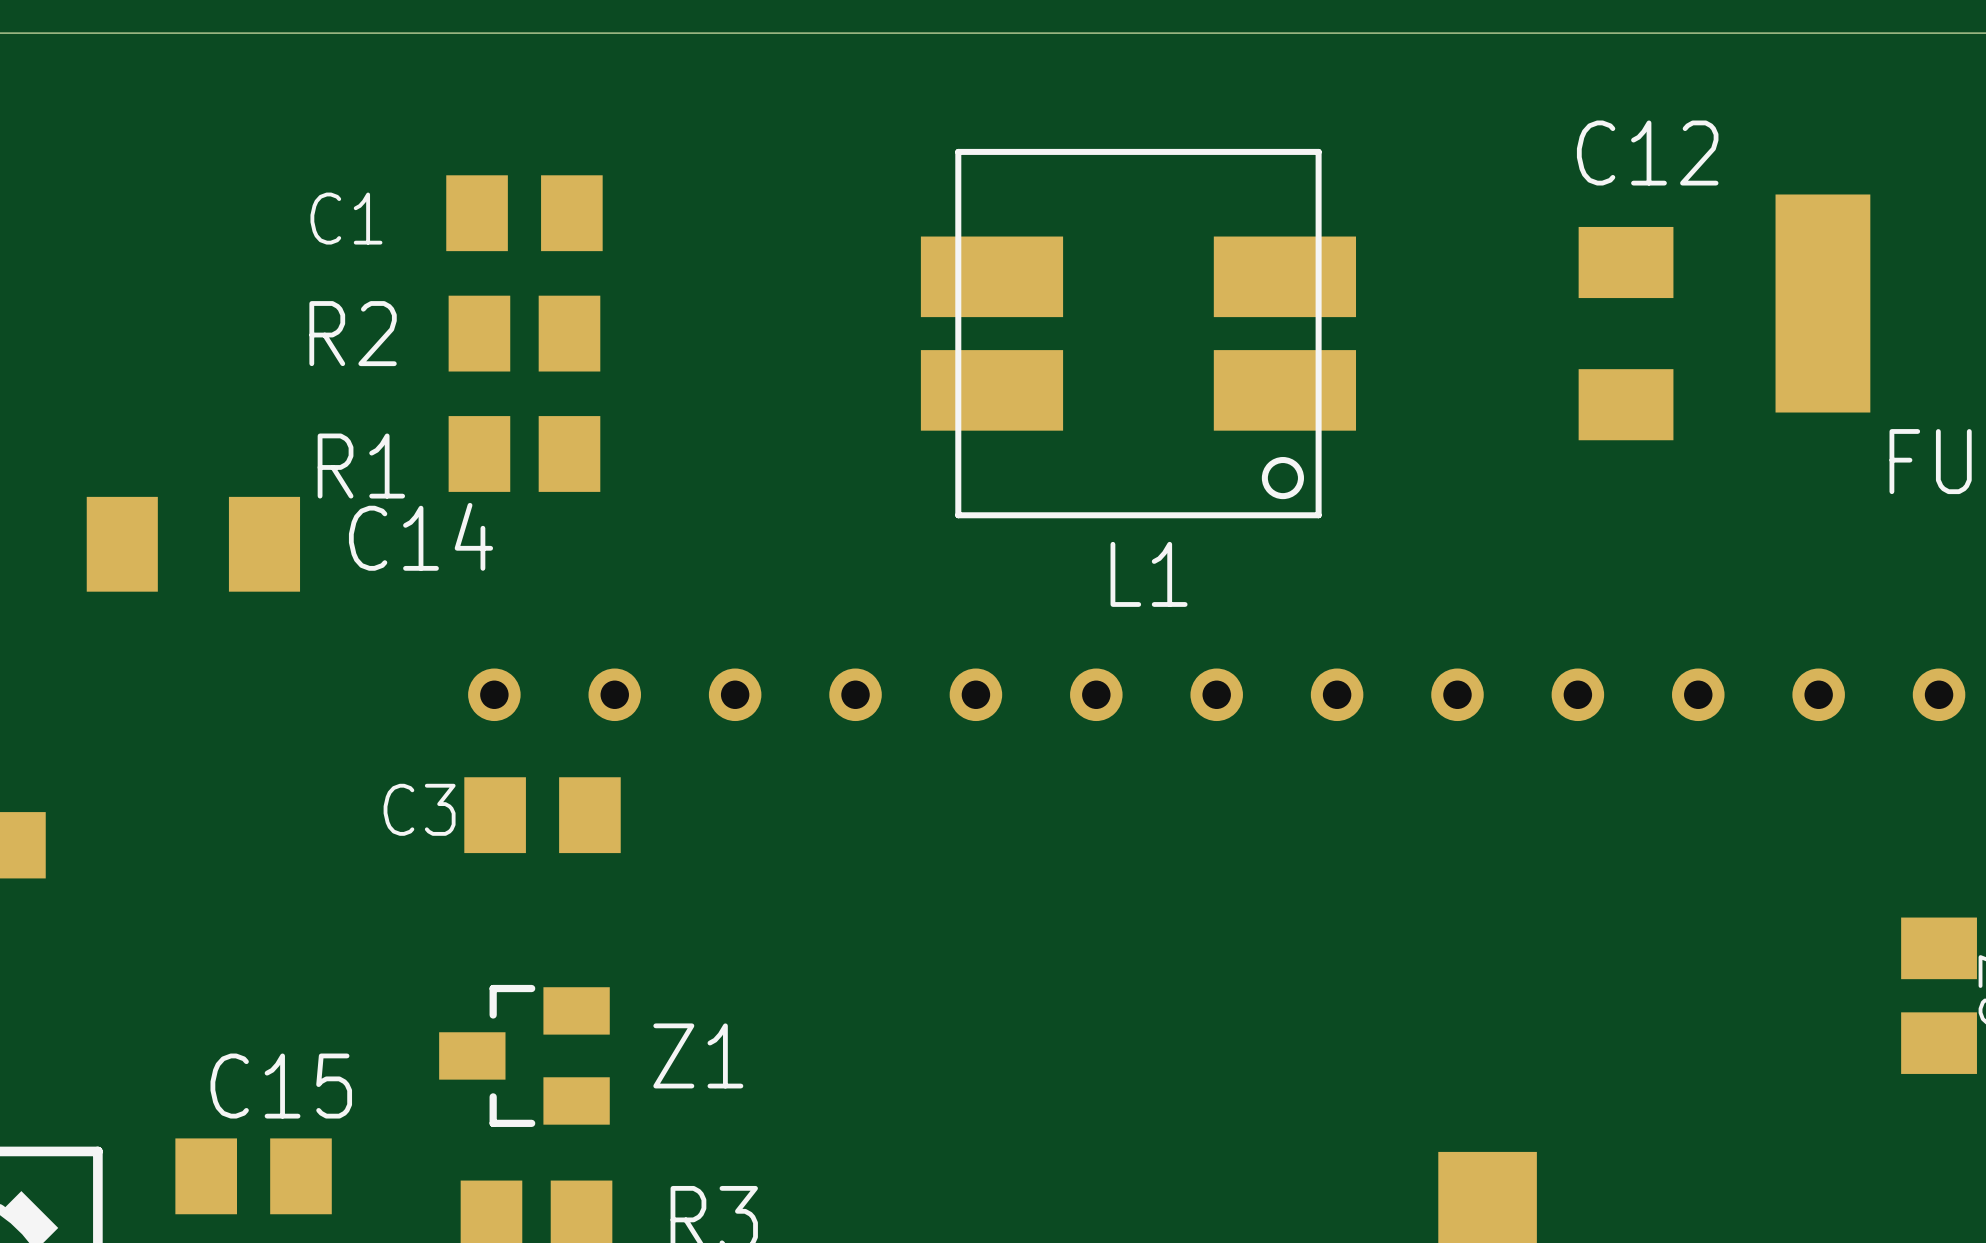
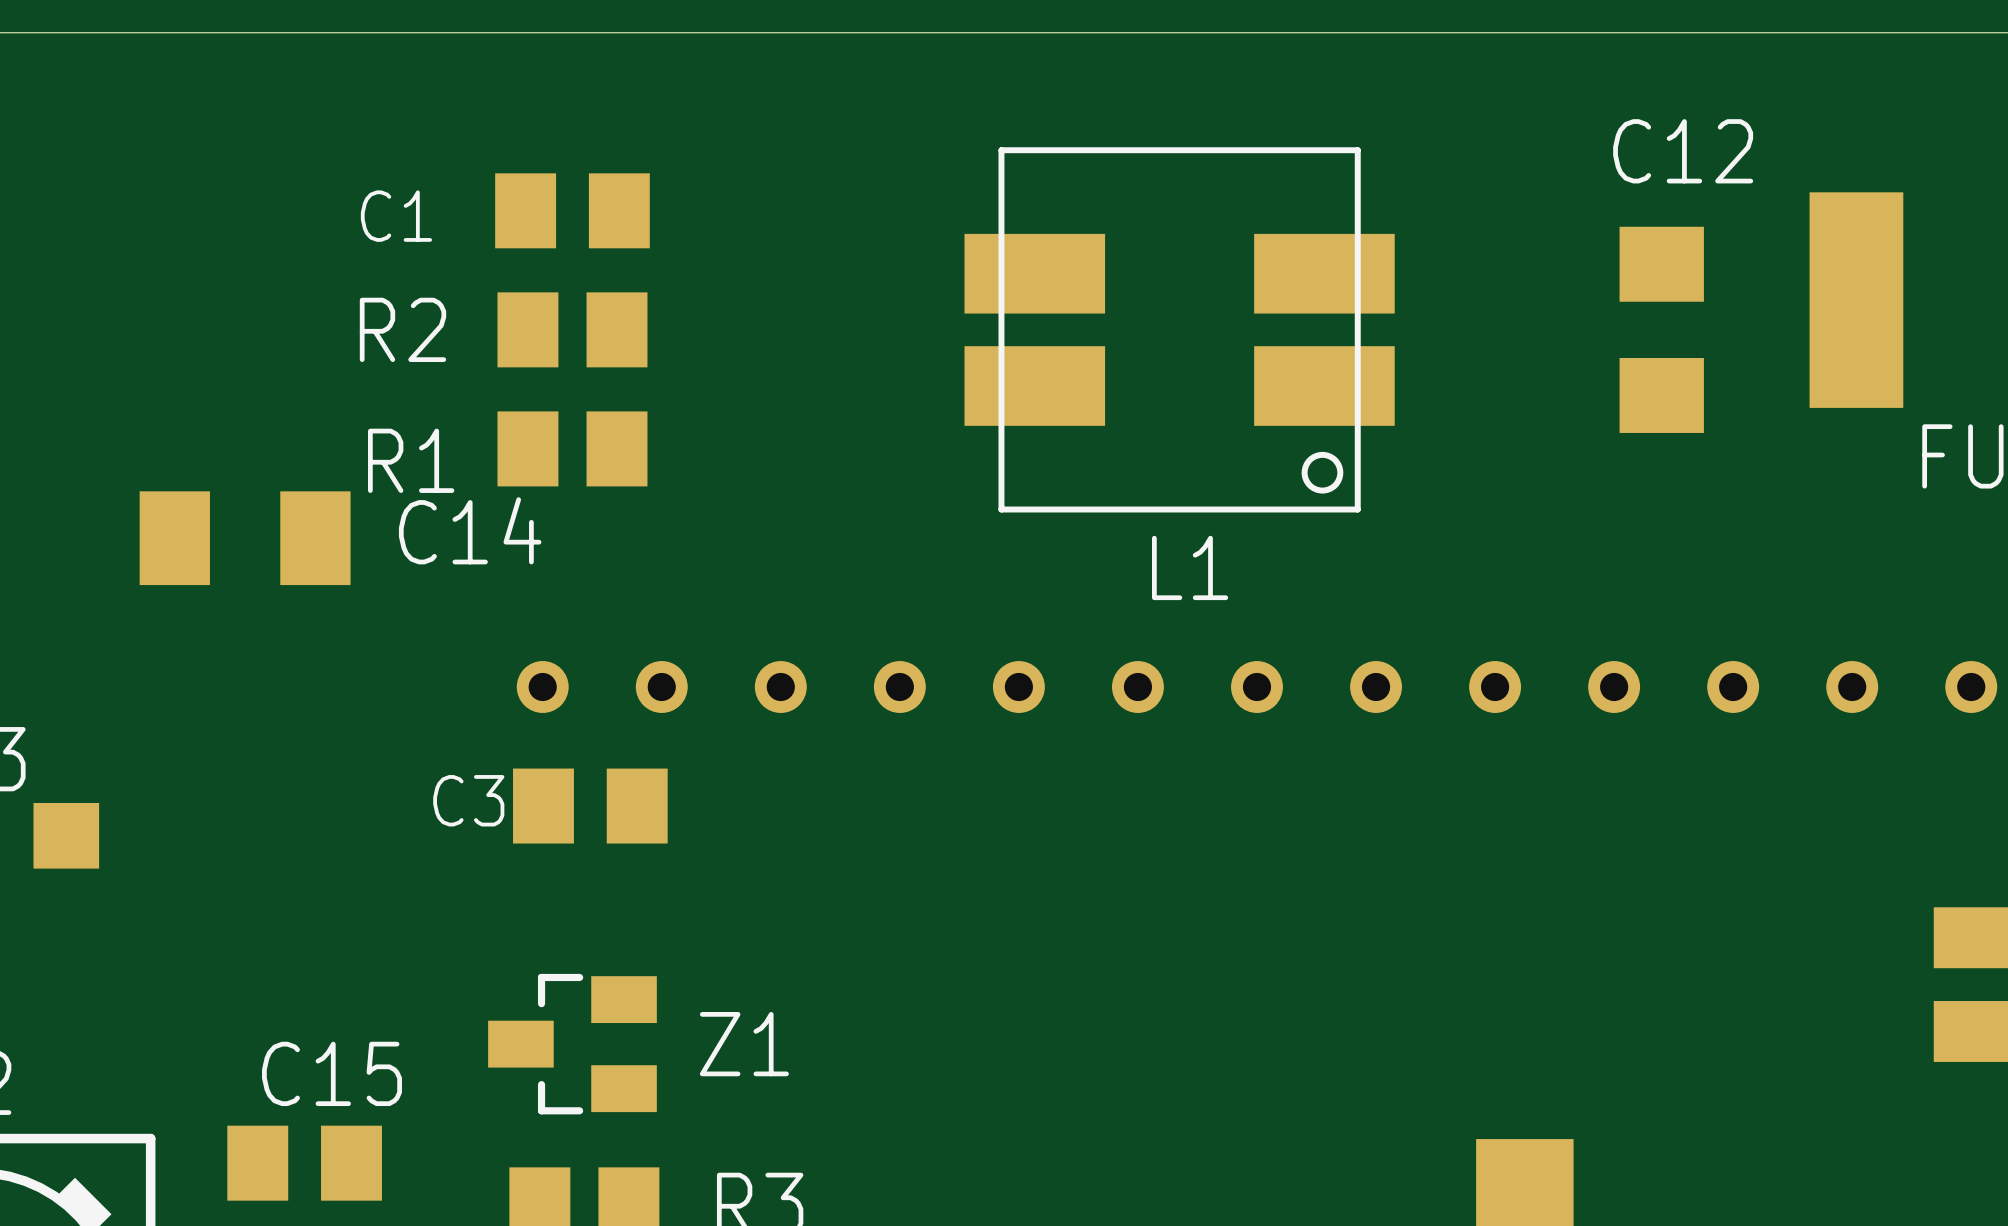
C12 footprint: [1578, 226, 1674, 441] -> [1619, 226, 1704, 433]

